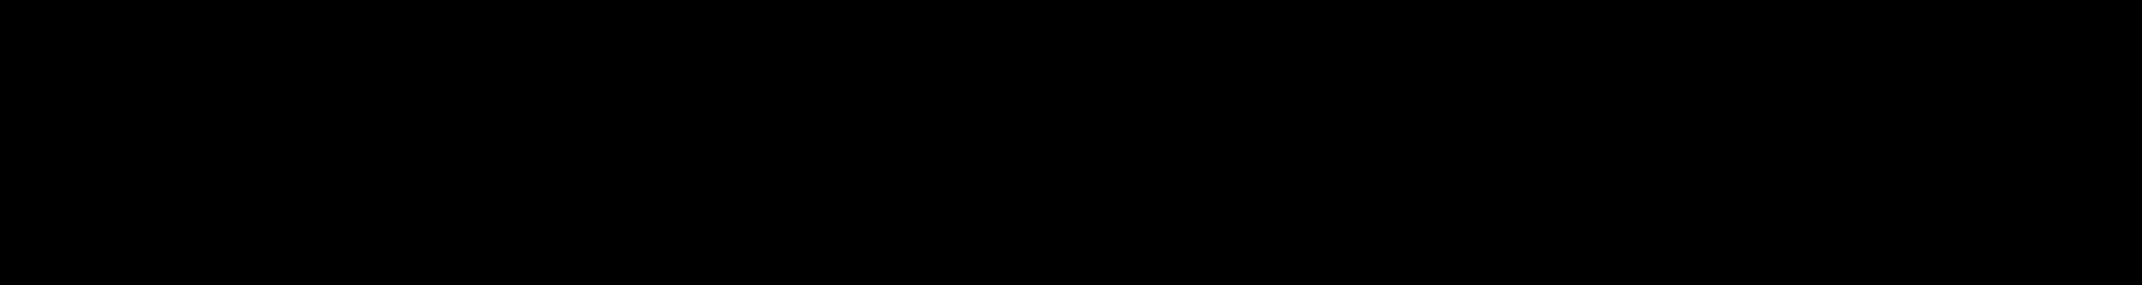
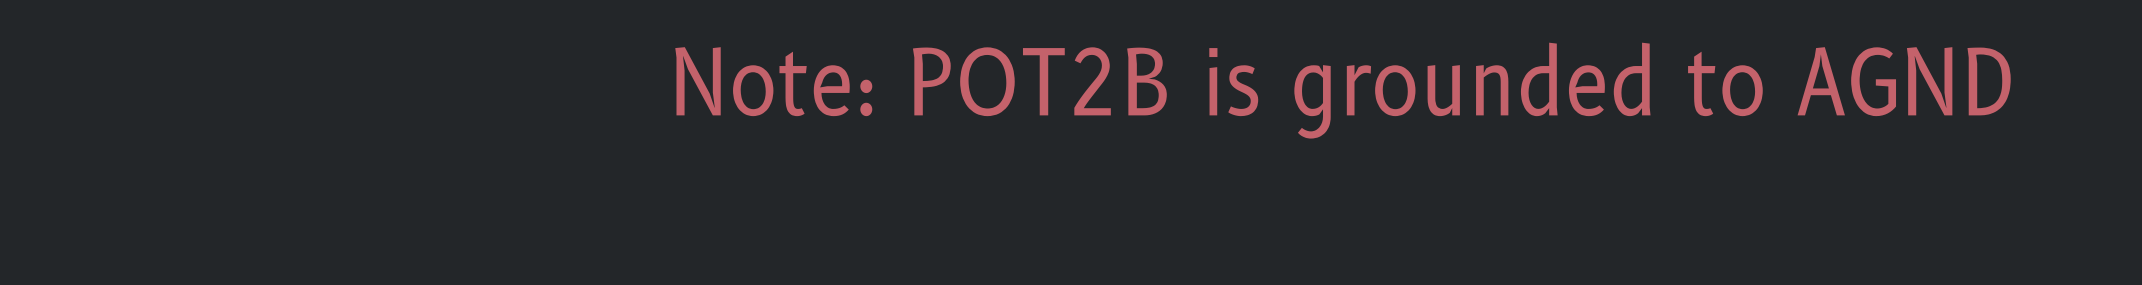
text: none -> Note: POT2B is grounded to AGND (1343, 90)

